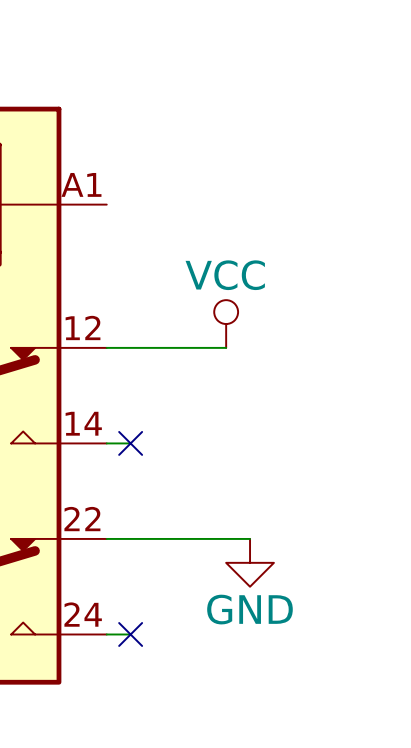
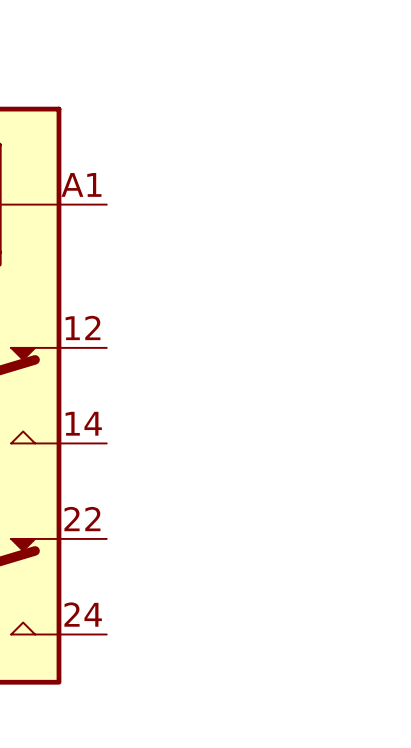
power symbol: VCC (226, 324) -> none
wire: (106, 347) (226, 347) -> none
wire: (106, 443) (130, 443) -> none
no-connect mark: (130, 443) -> none
wire: (106, 538) (250, 538) -> none
power symbol: GND (250, 562) -> none
wire: (106, 634) (130, 634) -> none
no-connect mark: (130, 634) -> none

